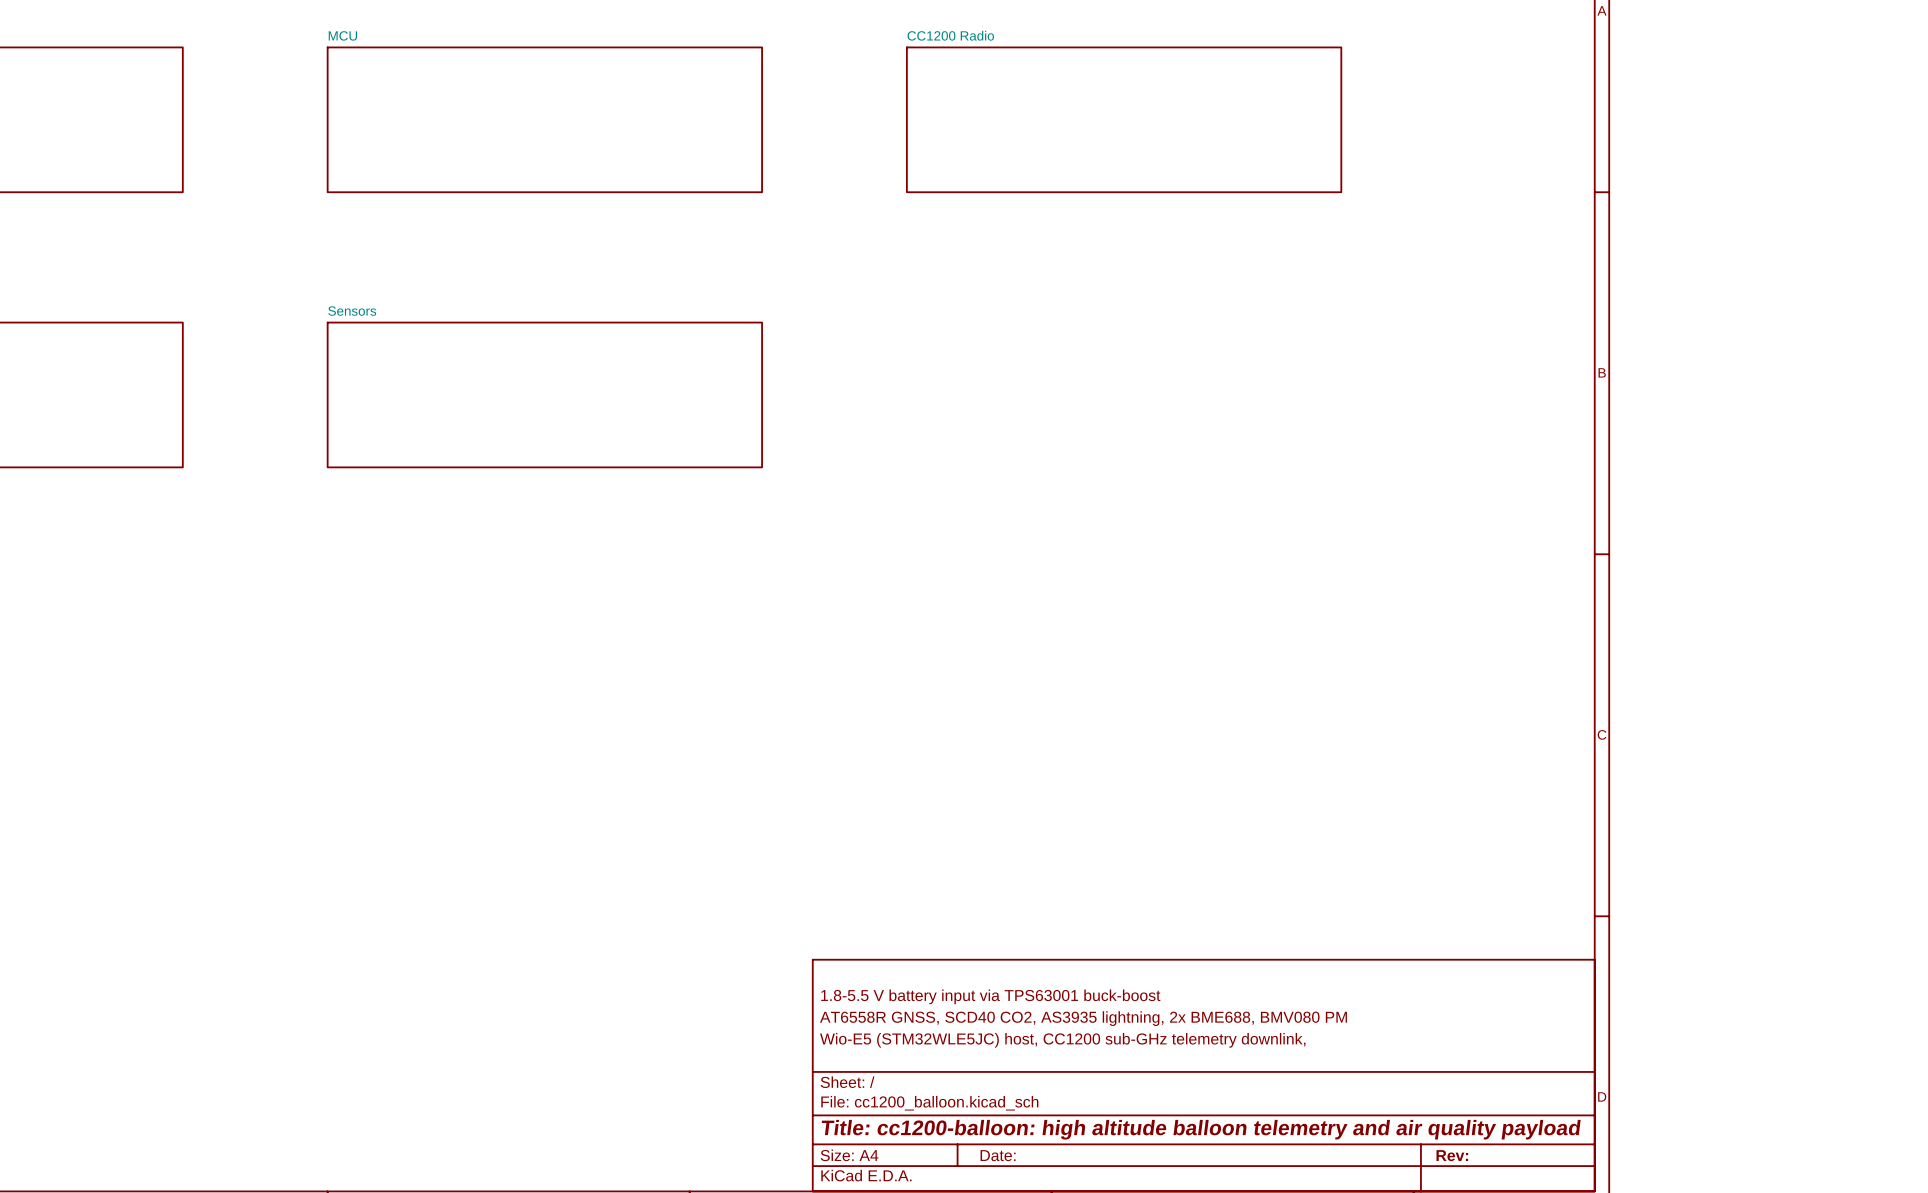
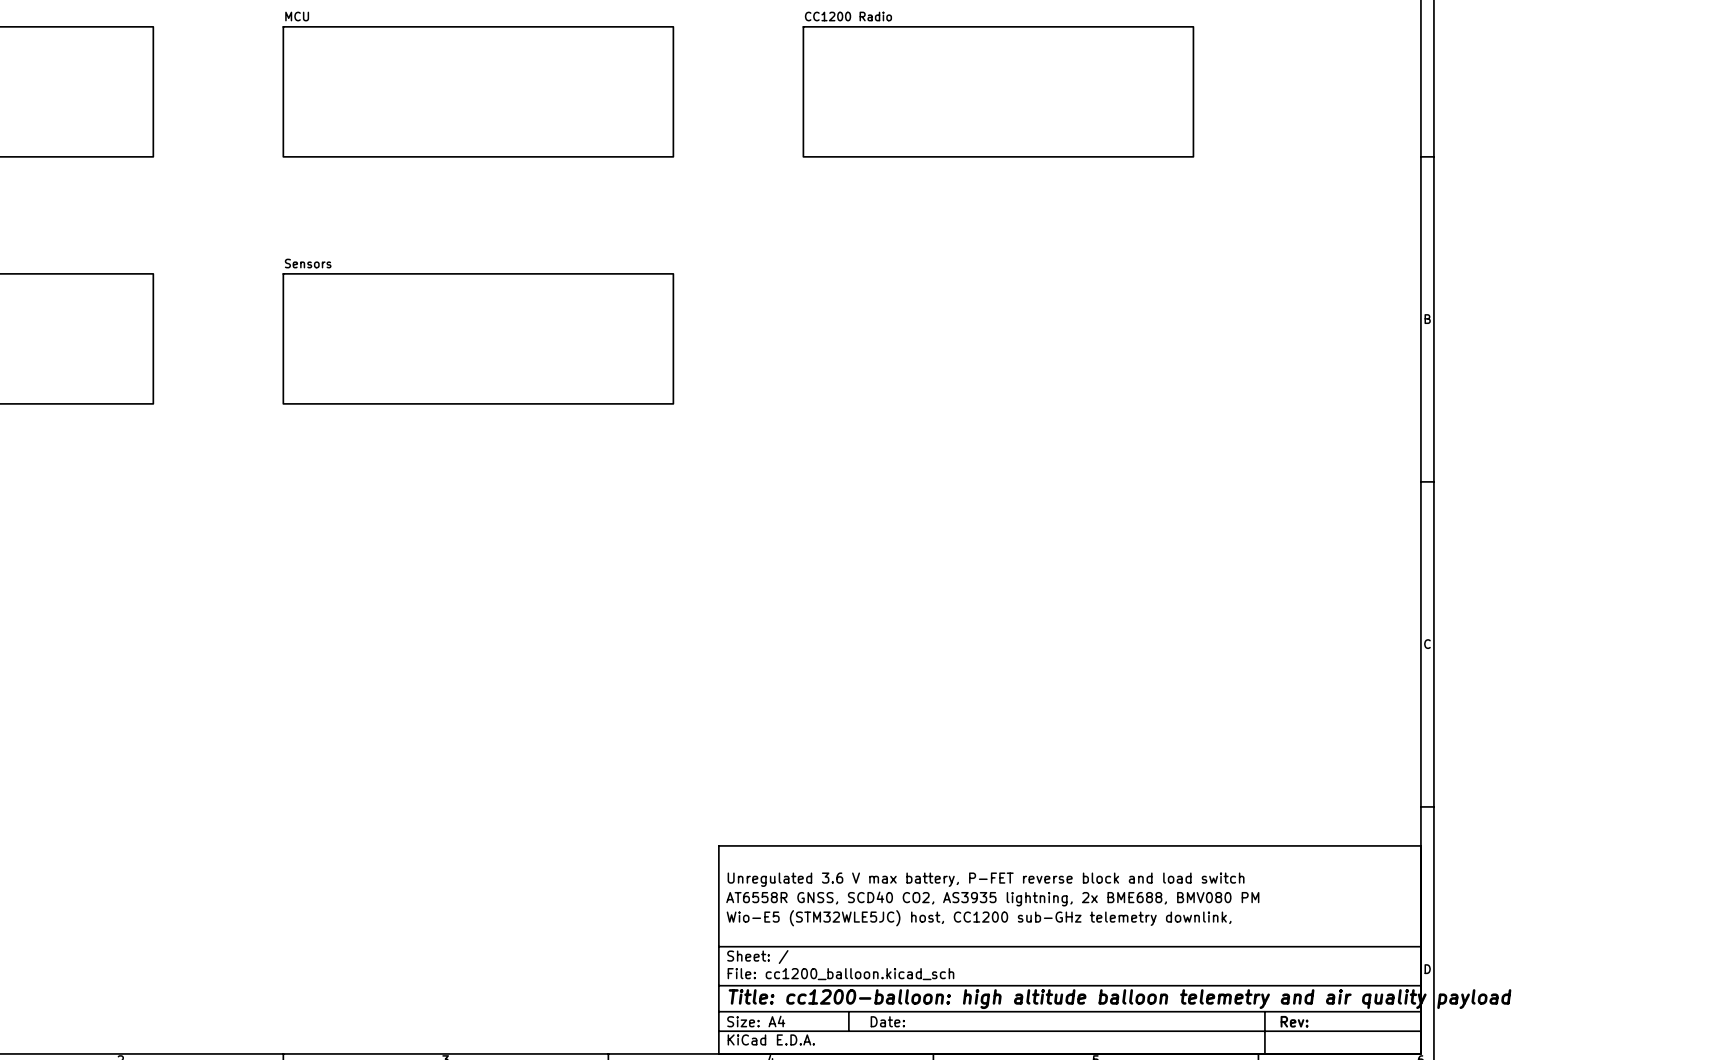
title block: 1.8-5.5 V battery input via TPS63001 buck-boost (990, 996) -> Unregulated 3.6 V max battery, P-FET reverse block and load switch (986, 879)

